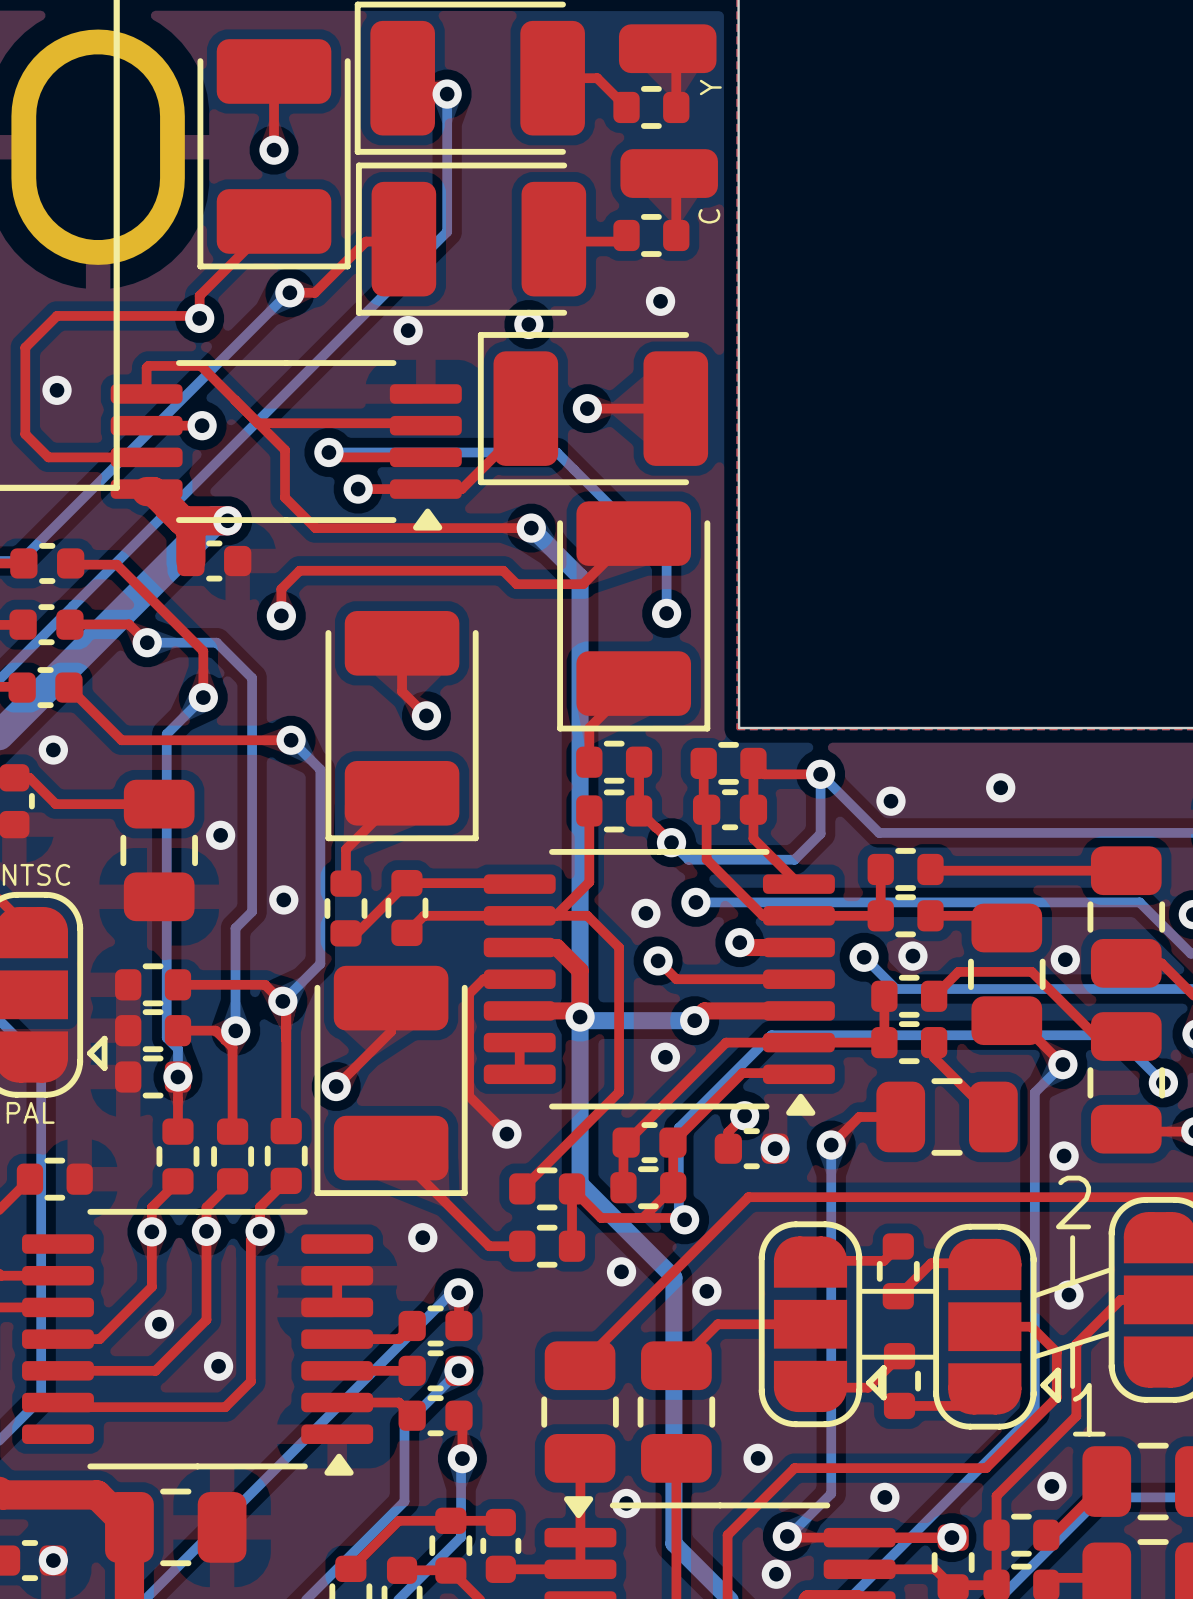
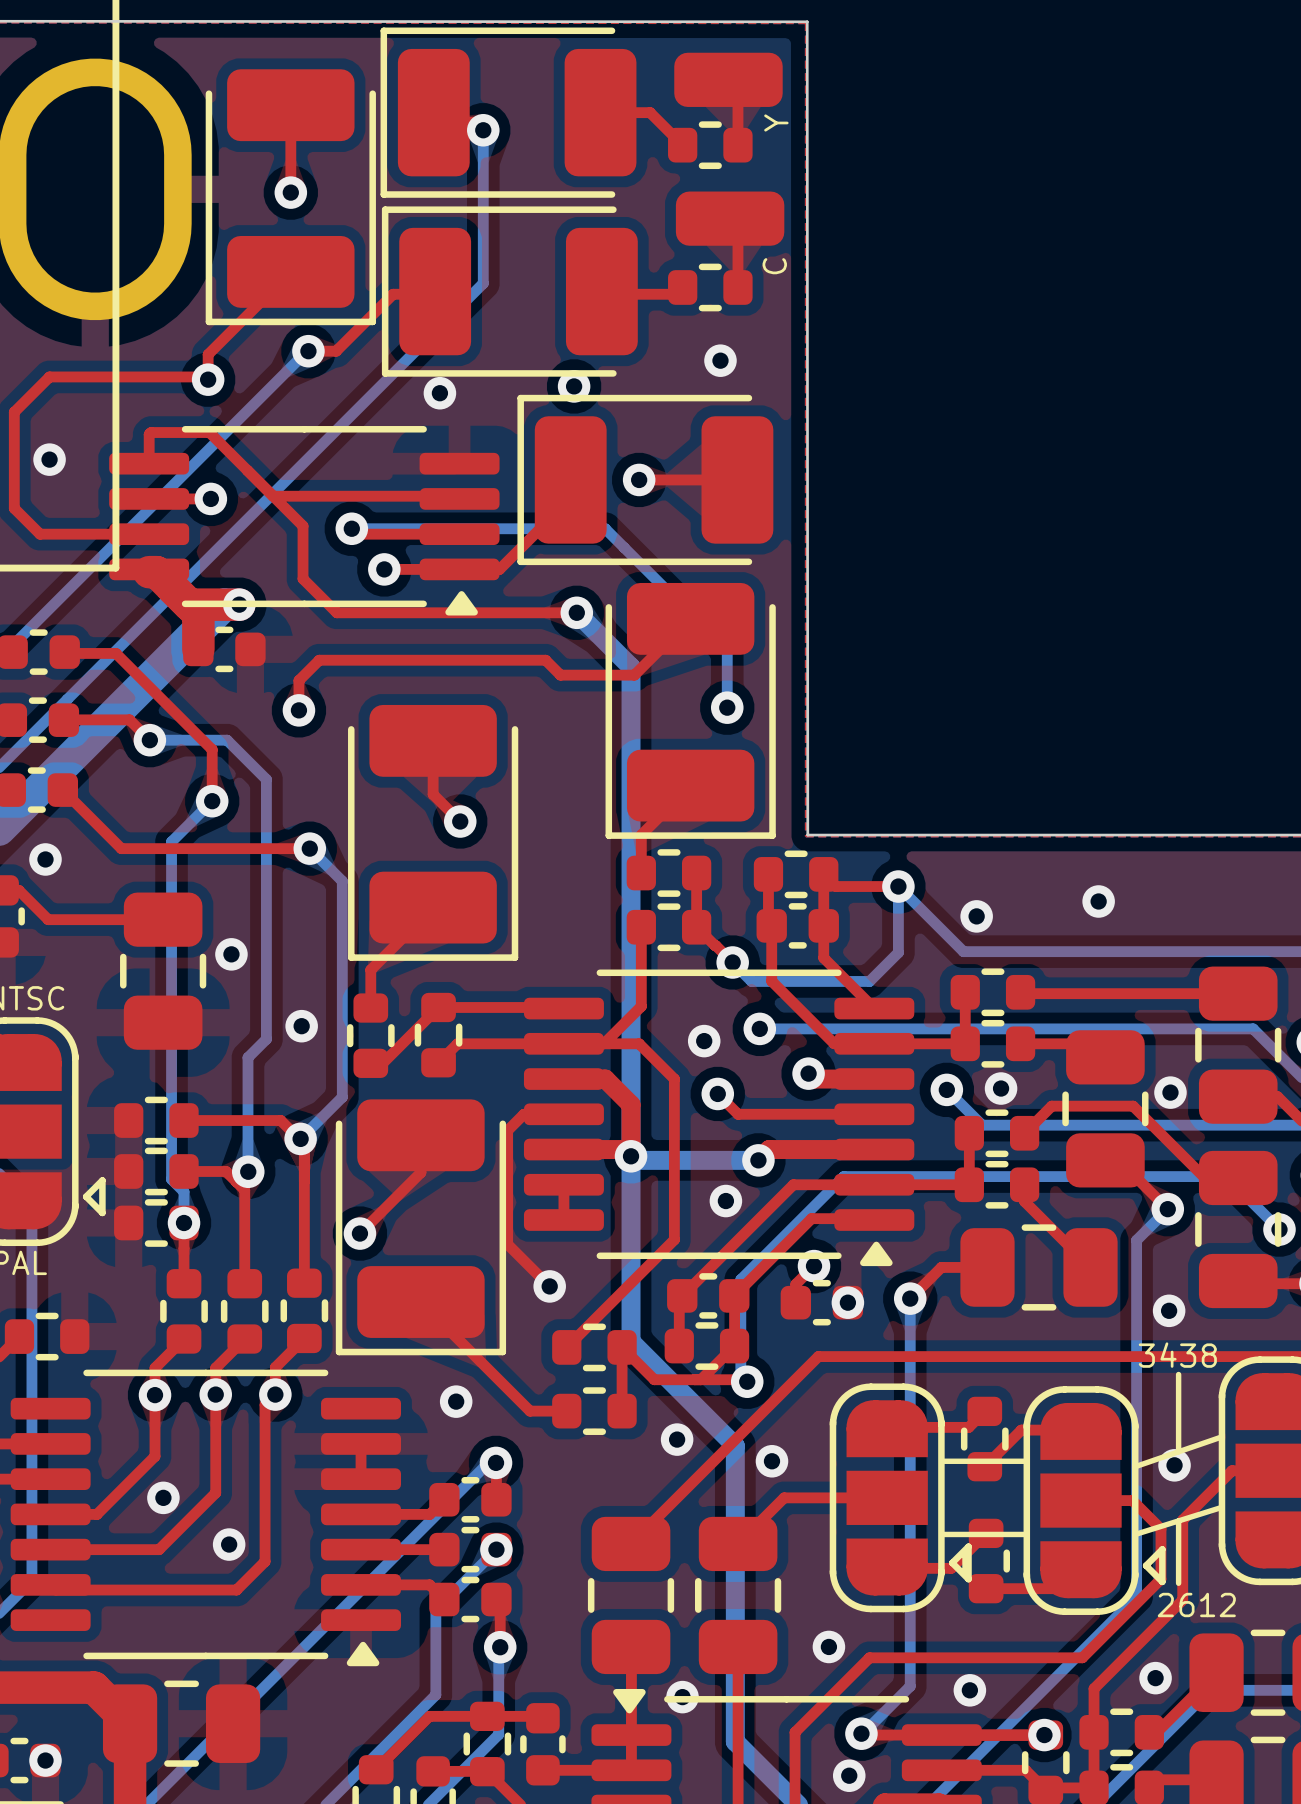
text: 2 (1073, 1202) -> 3438 (1177, 1355)
line: none -> (1178, 1374) (1178, 1401)
line: none -> (1178, 1566) (1178, 1583)
text: 1 (1089, 1409) -> 2612 (1196, 1605)

